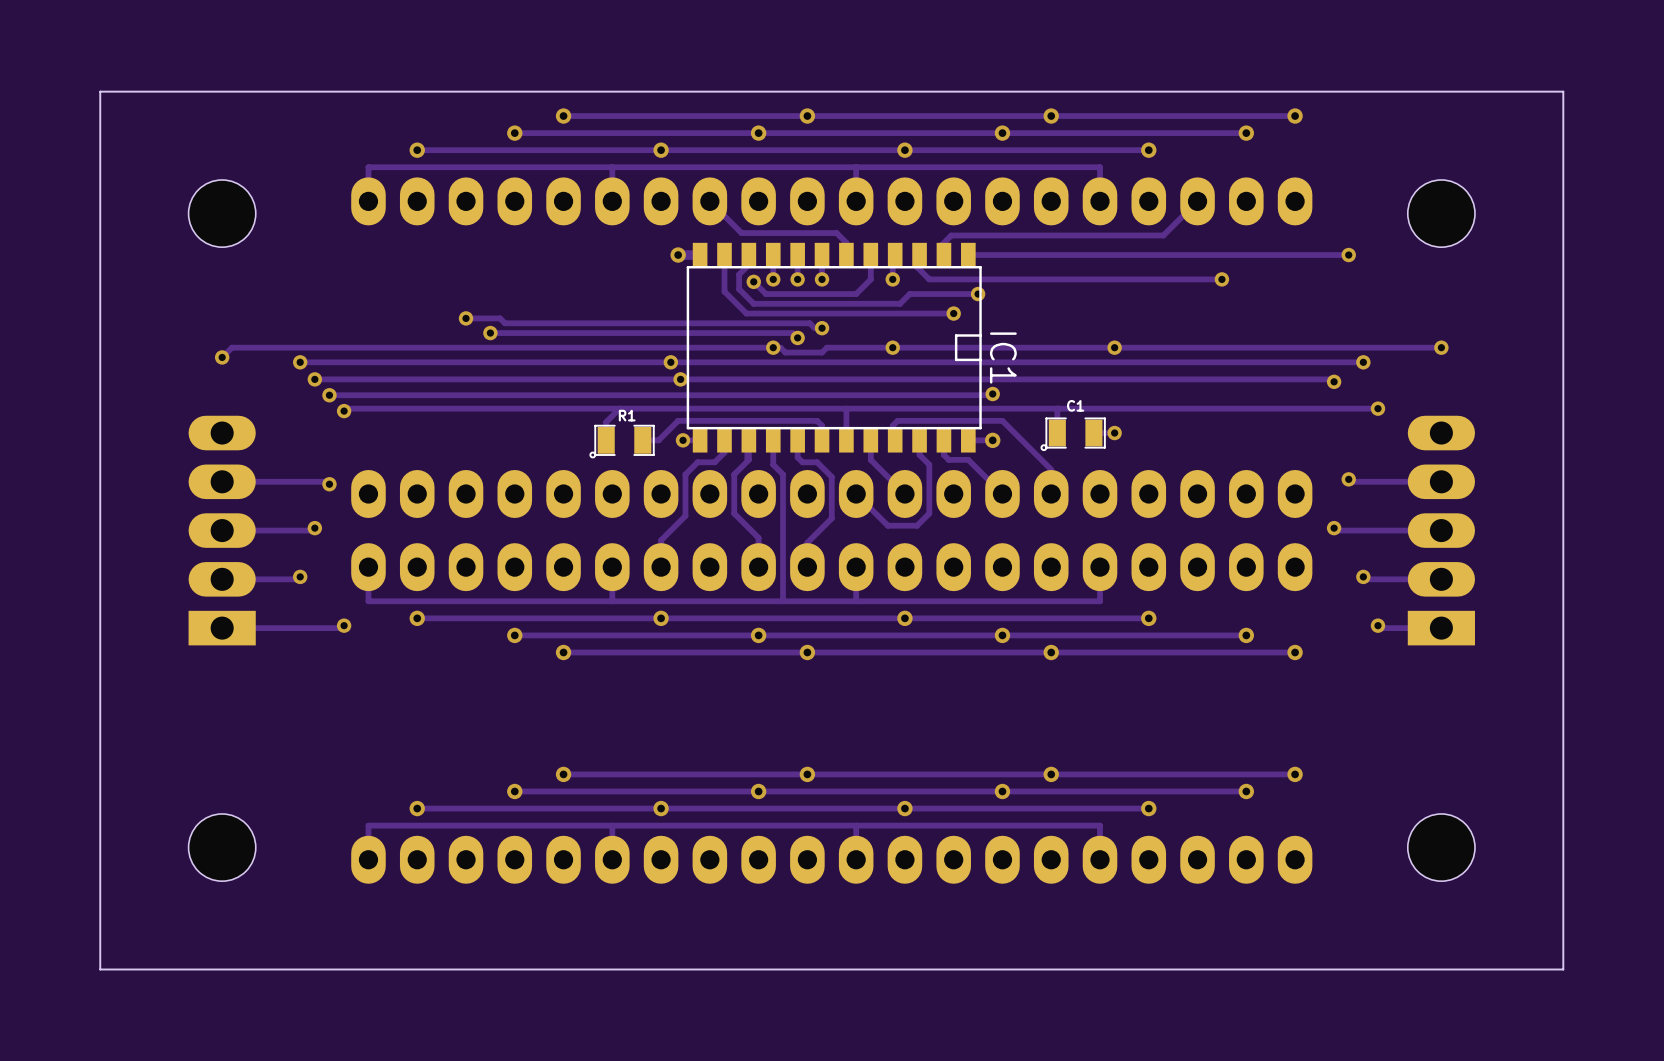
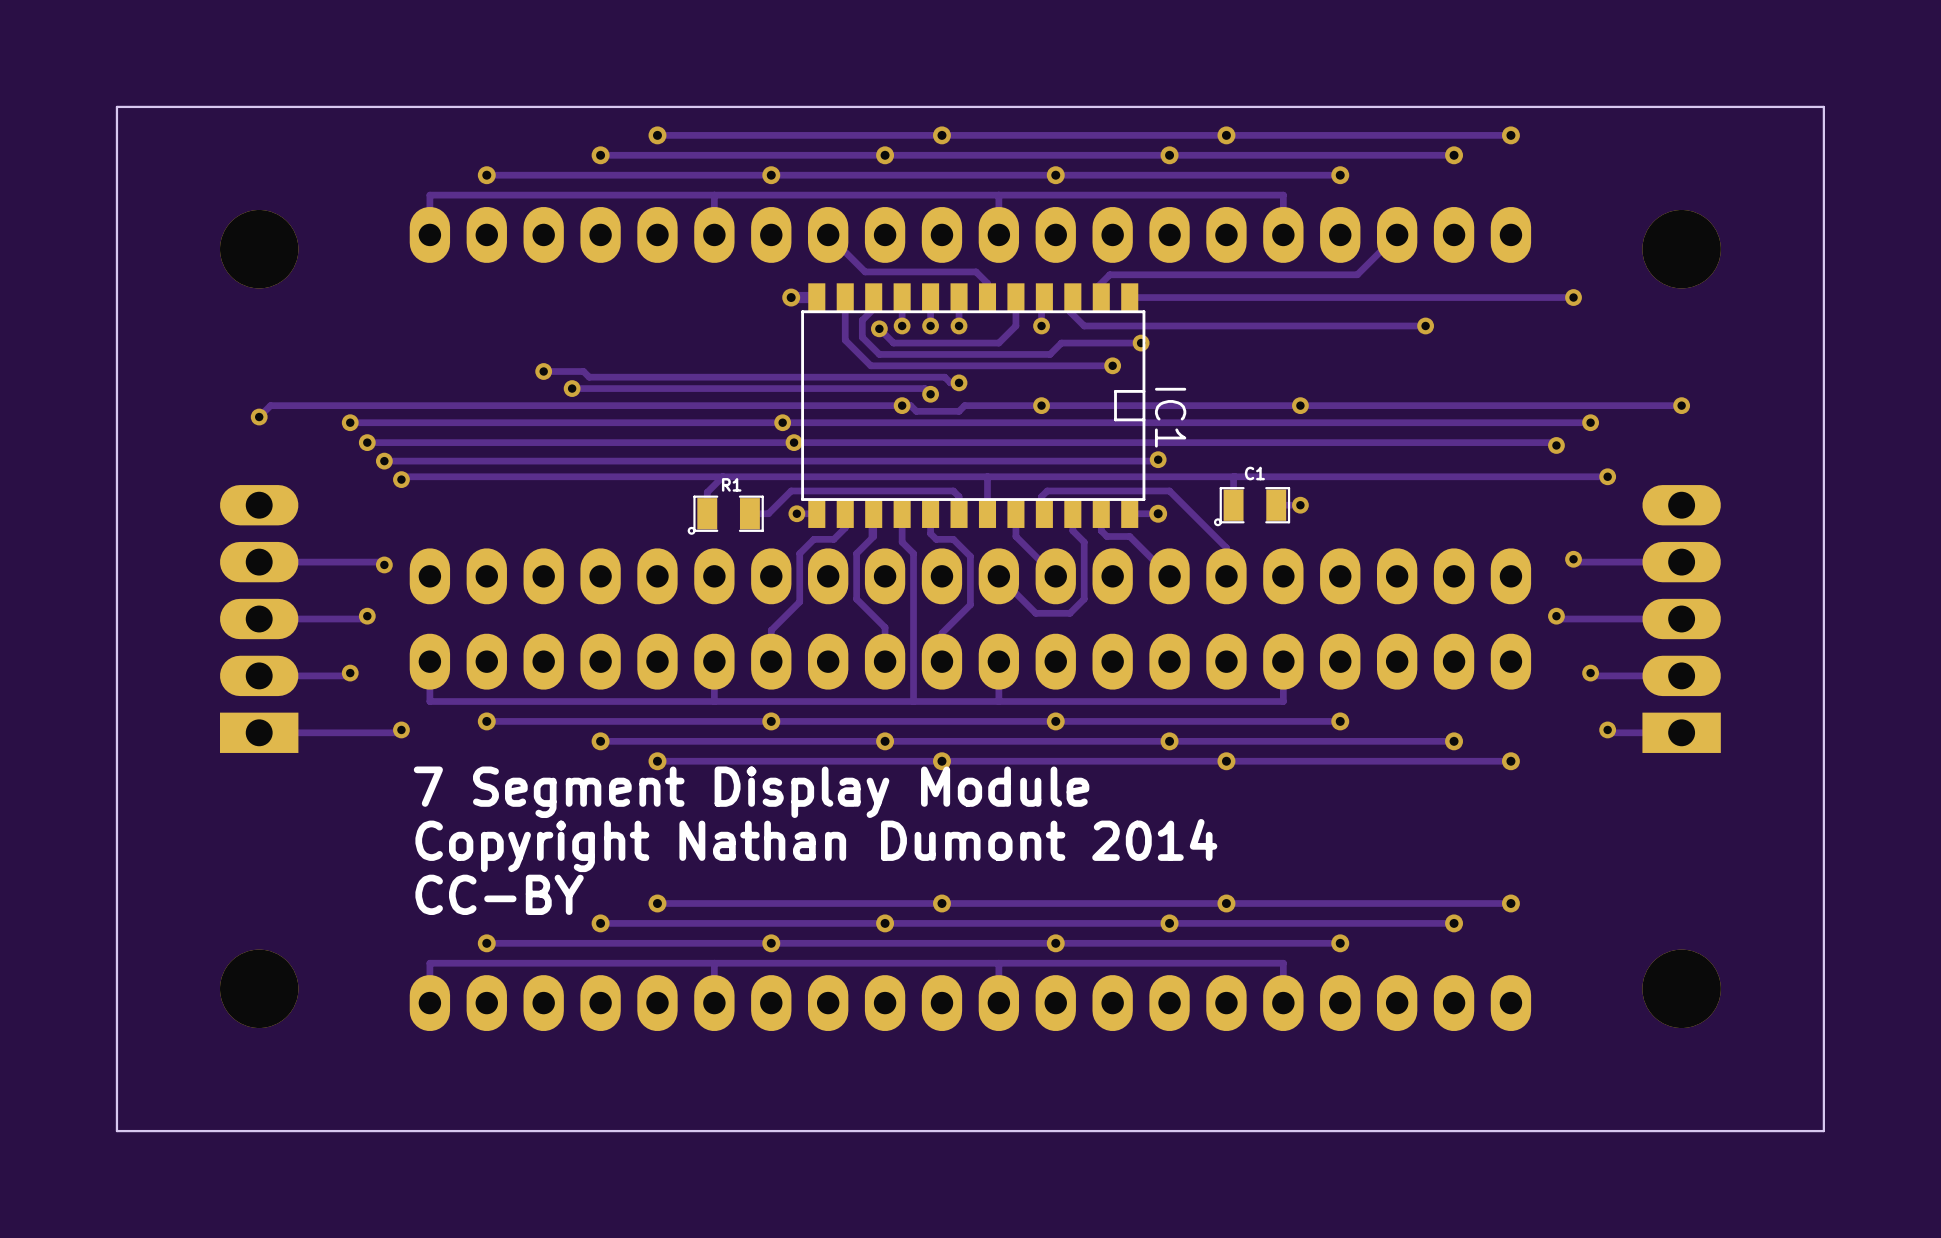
part footprint: [188, 179, 256, 248] -> [220, 209, 299, 289]
part footprint: [1407, 179, 1475, 248] -> [1642, 209, 1721, 289]
text: none -> 7 Segment Display Module (751, 792)
text: none -> Copyright Nathan Dumont 2014 (816, 845)
text: none -> CC-BY (499, 894)
part footprint: [188, 813, 256, 882] -> [220, 949, 299, 1029]
part footprint: [1407, 813, 1475, 882] -> [1642, 949, 1721, 1029]

